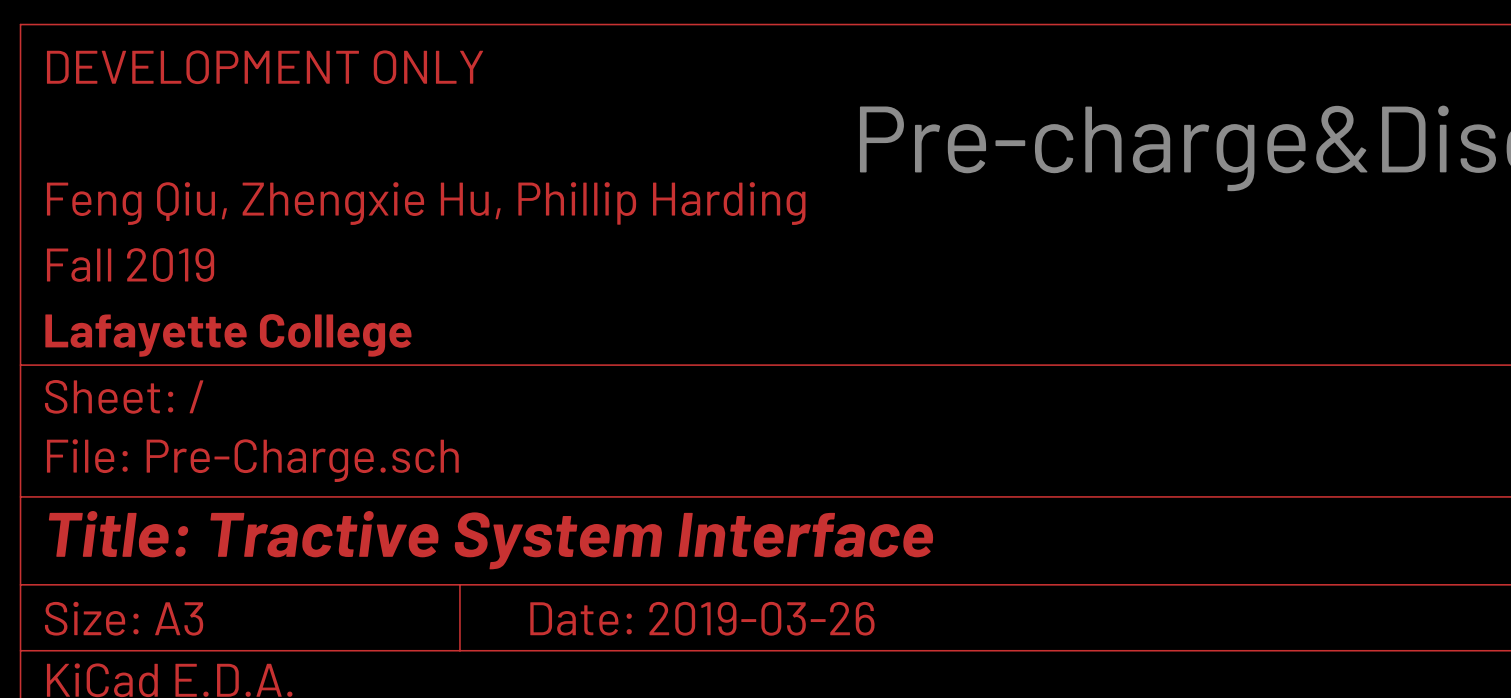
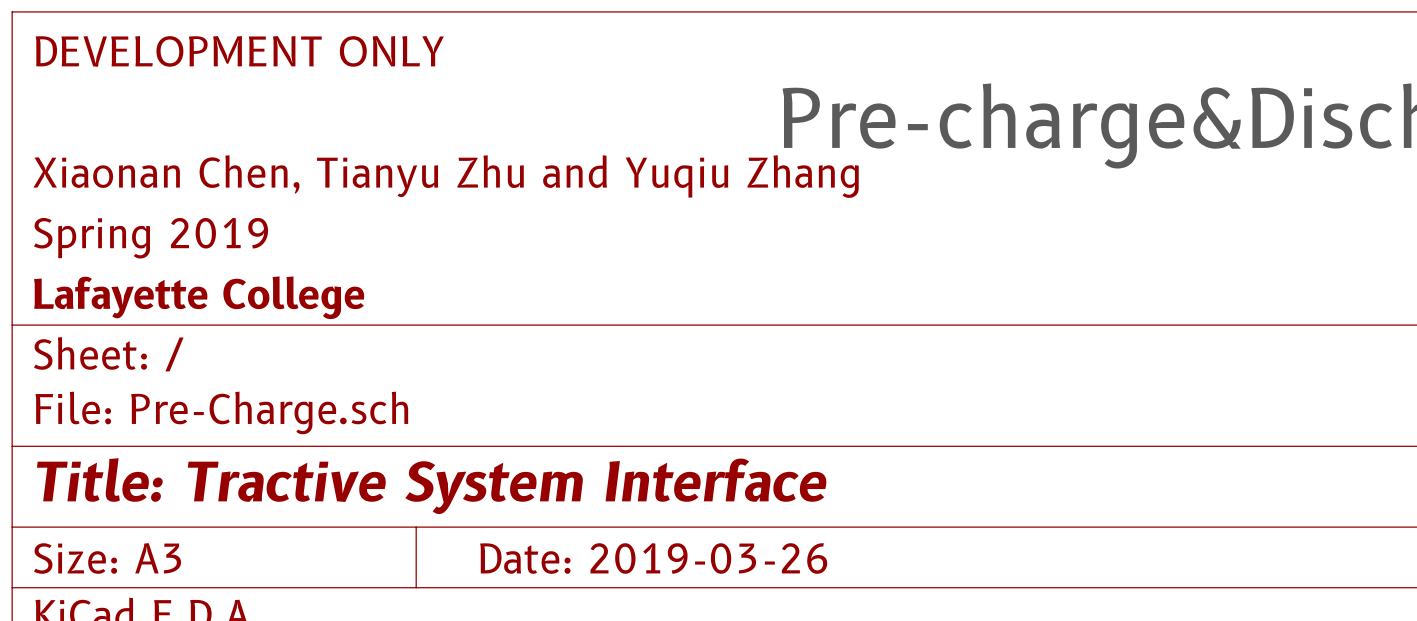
title block: Feng Qiu, Zhengxie Hu, Phillip Harding (426, 203) -> Xiaonan Chen, Tianyu Zhu and Yuqiu Zhang (446, 176)
title block: Fall 2019 (130, 265) -> Spring 2019 (151, 238)

